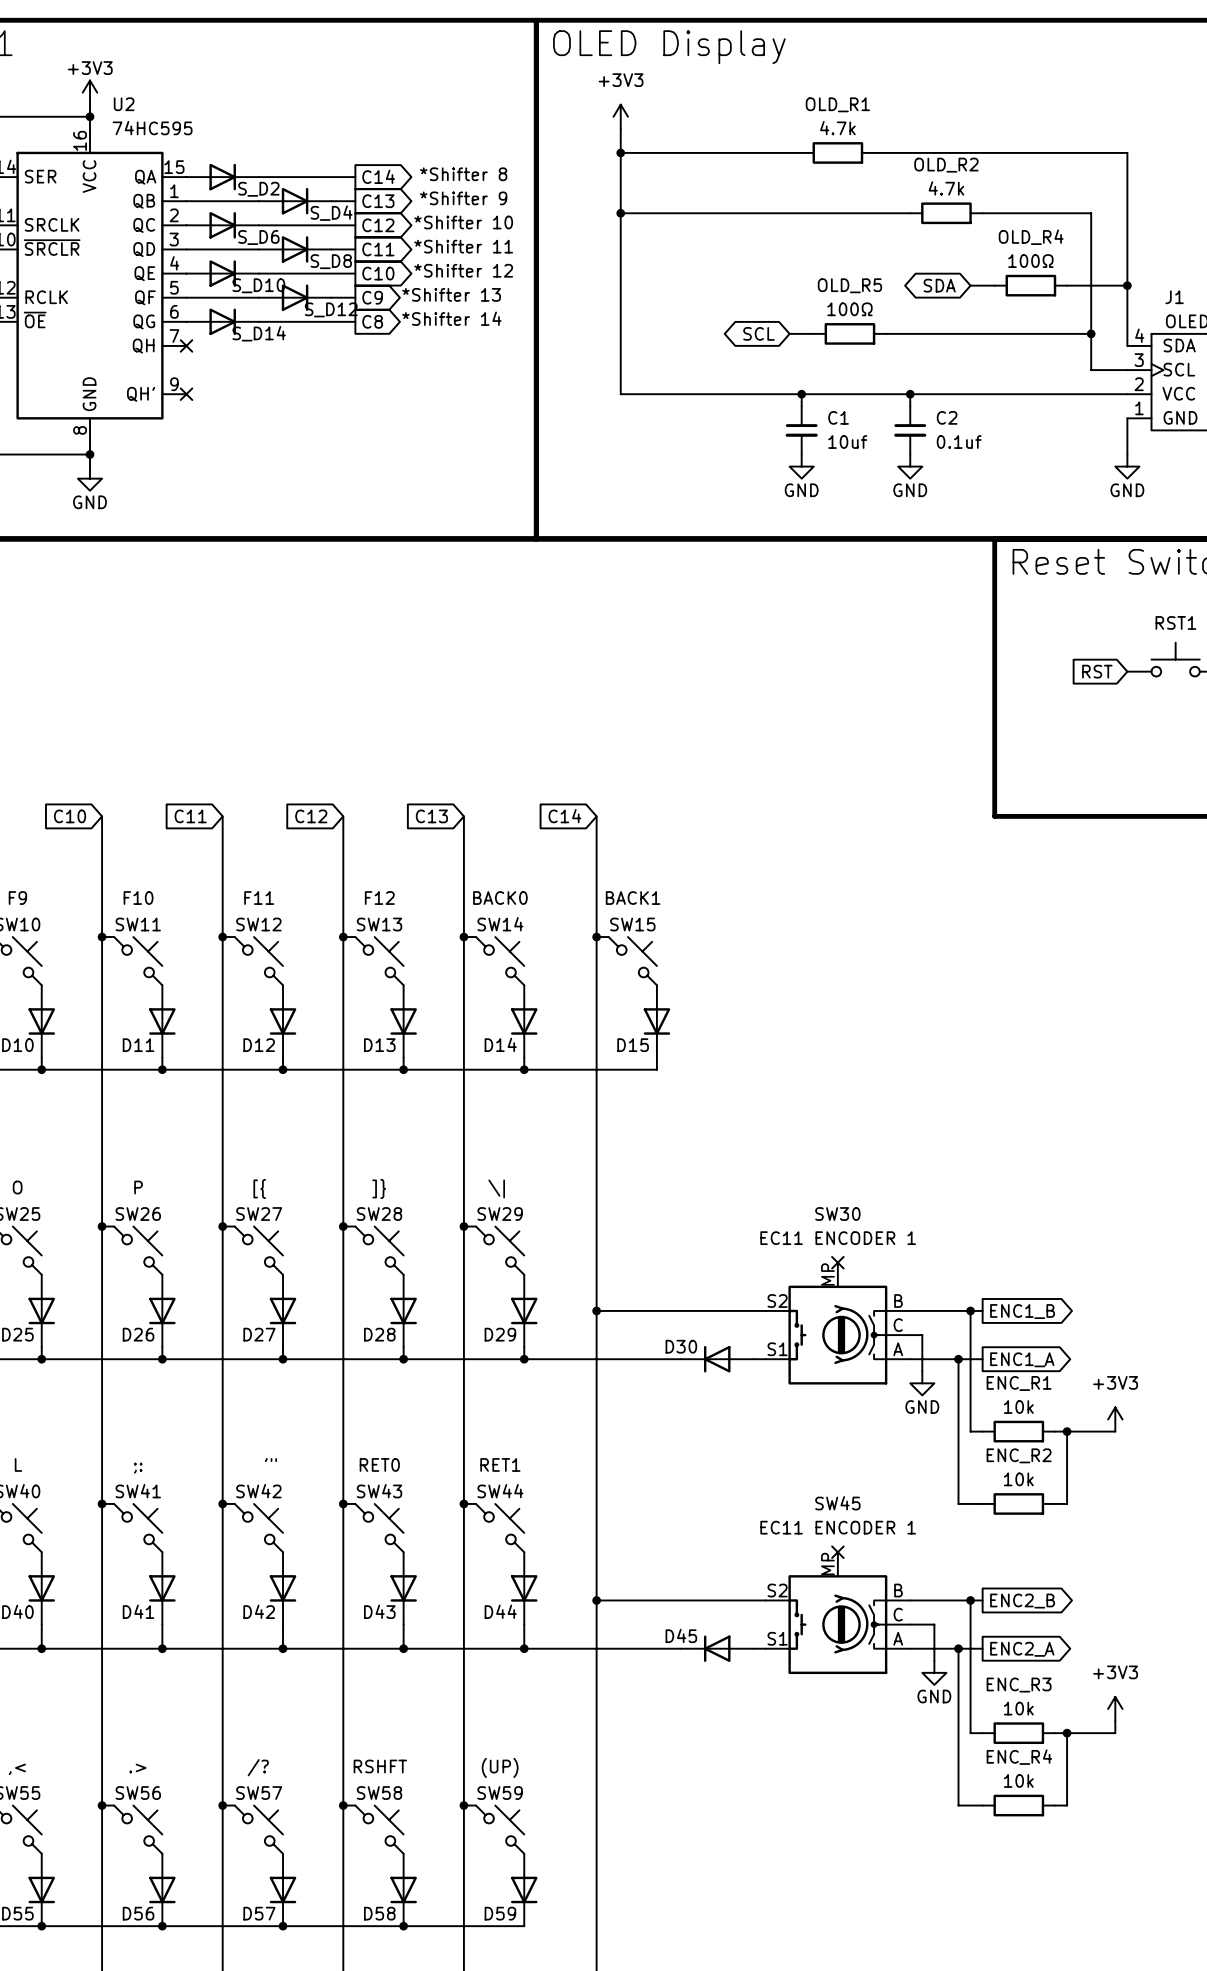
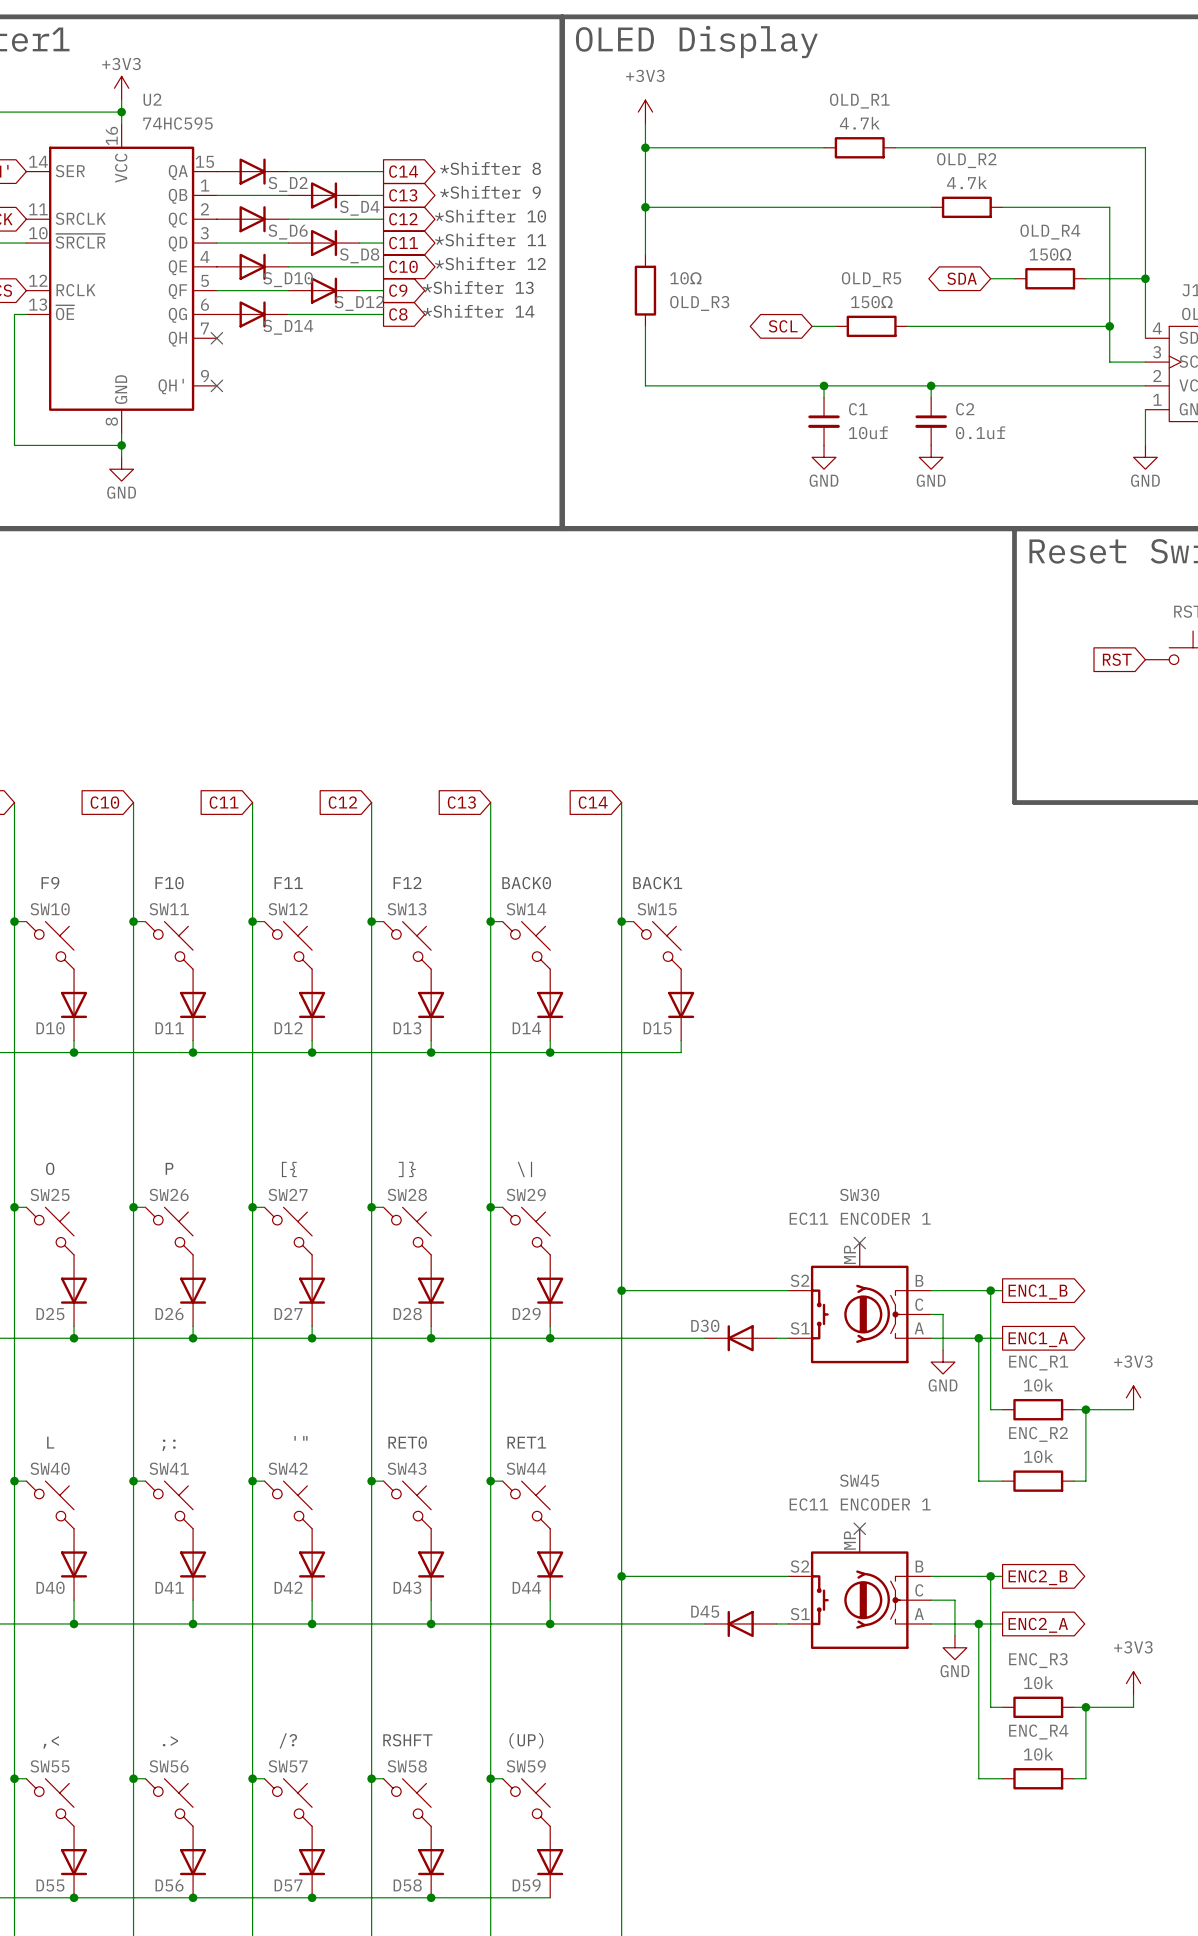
wire: (620, 261) (620, 333) -> none
OLD_R4 value: 100Ω (1030, 261) -> 150Ω (1050, 254)
OLD_R3: none -> 10Ω (645, 290)
OLD_R5 value: 100Ω (849, 309) -> 150Ω (871, 302)

